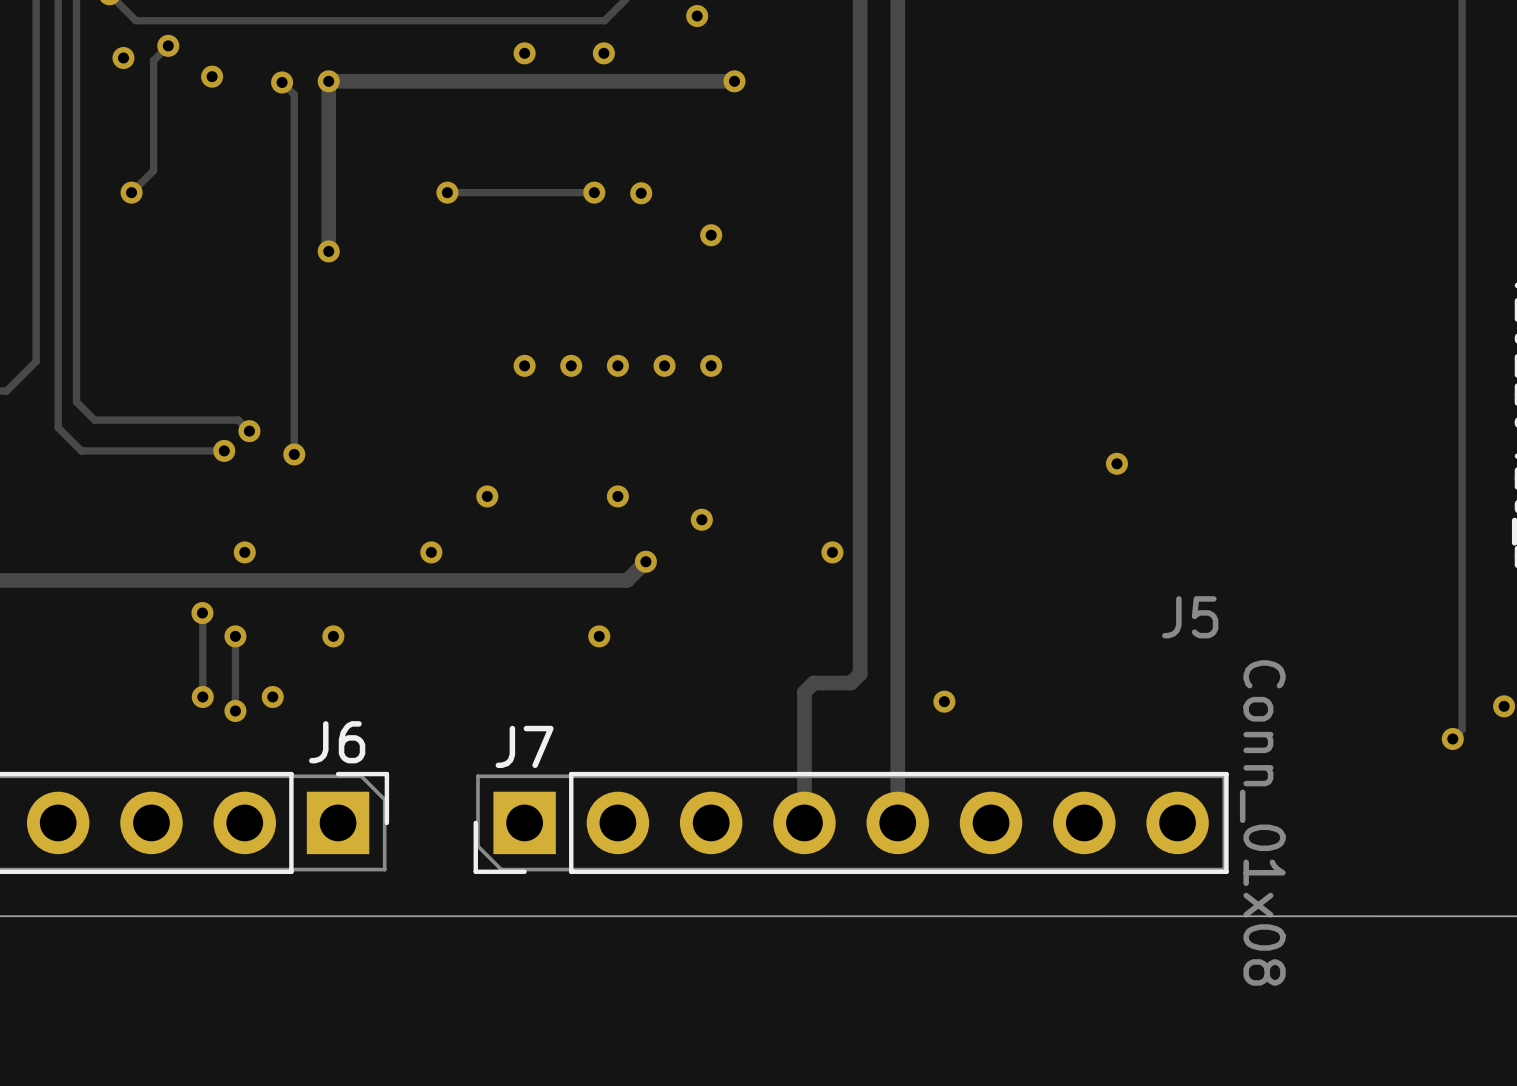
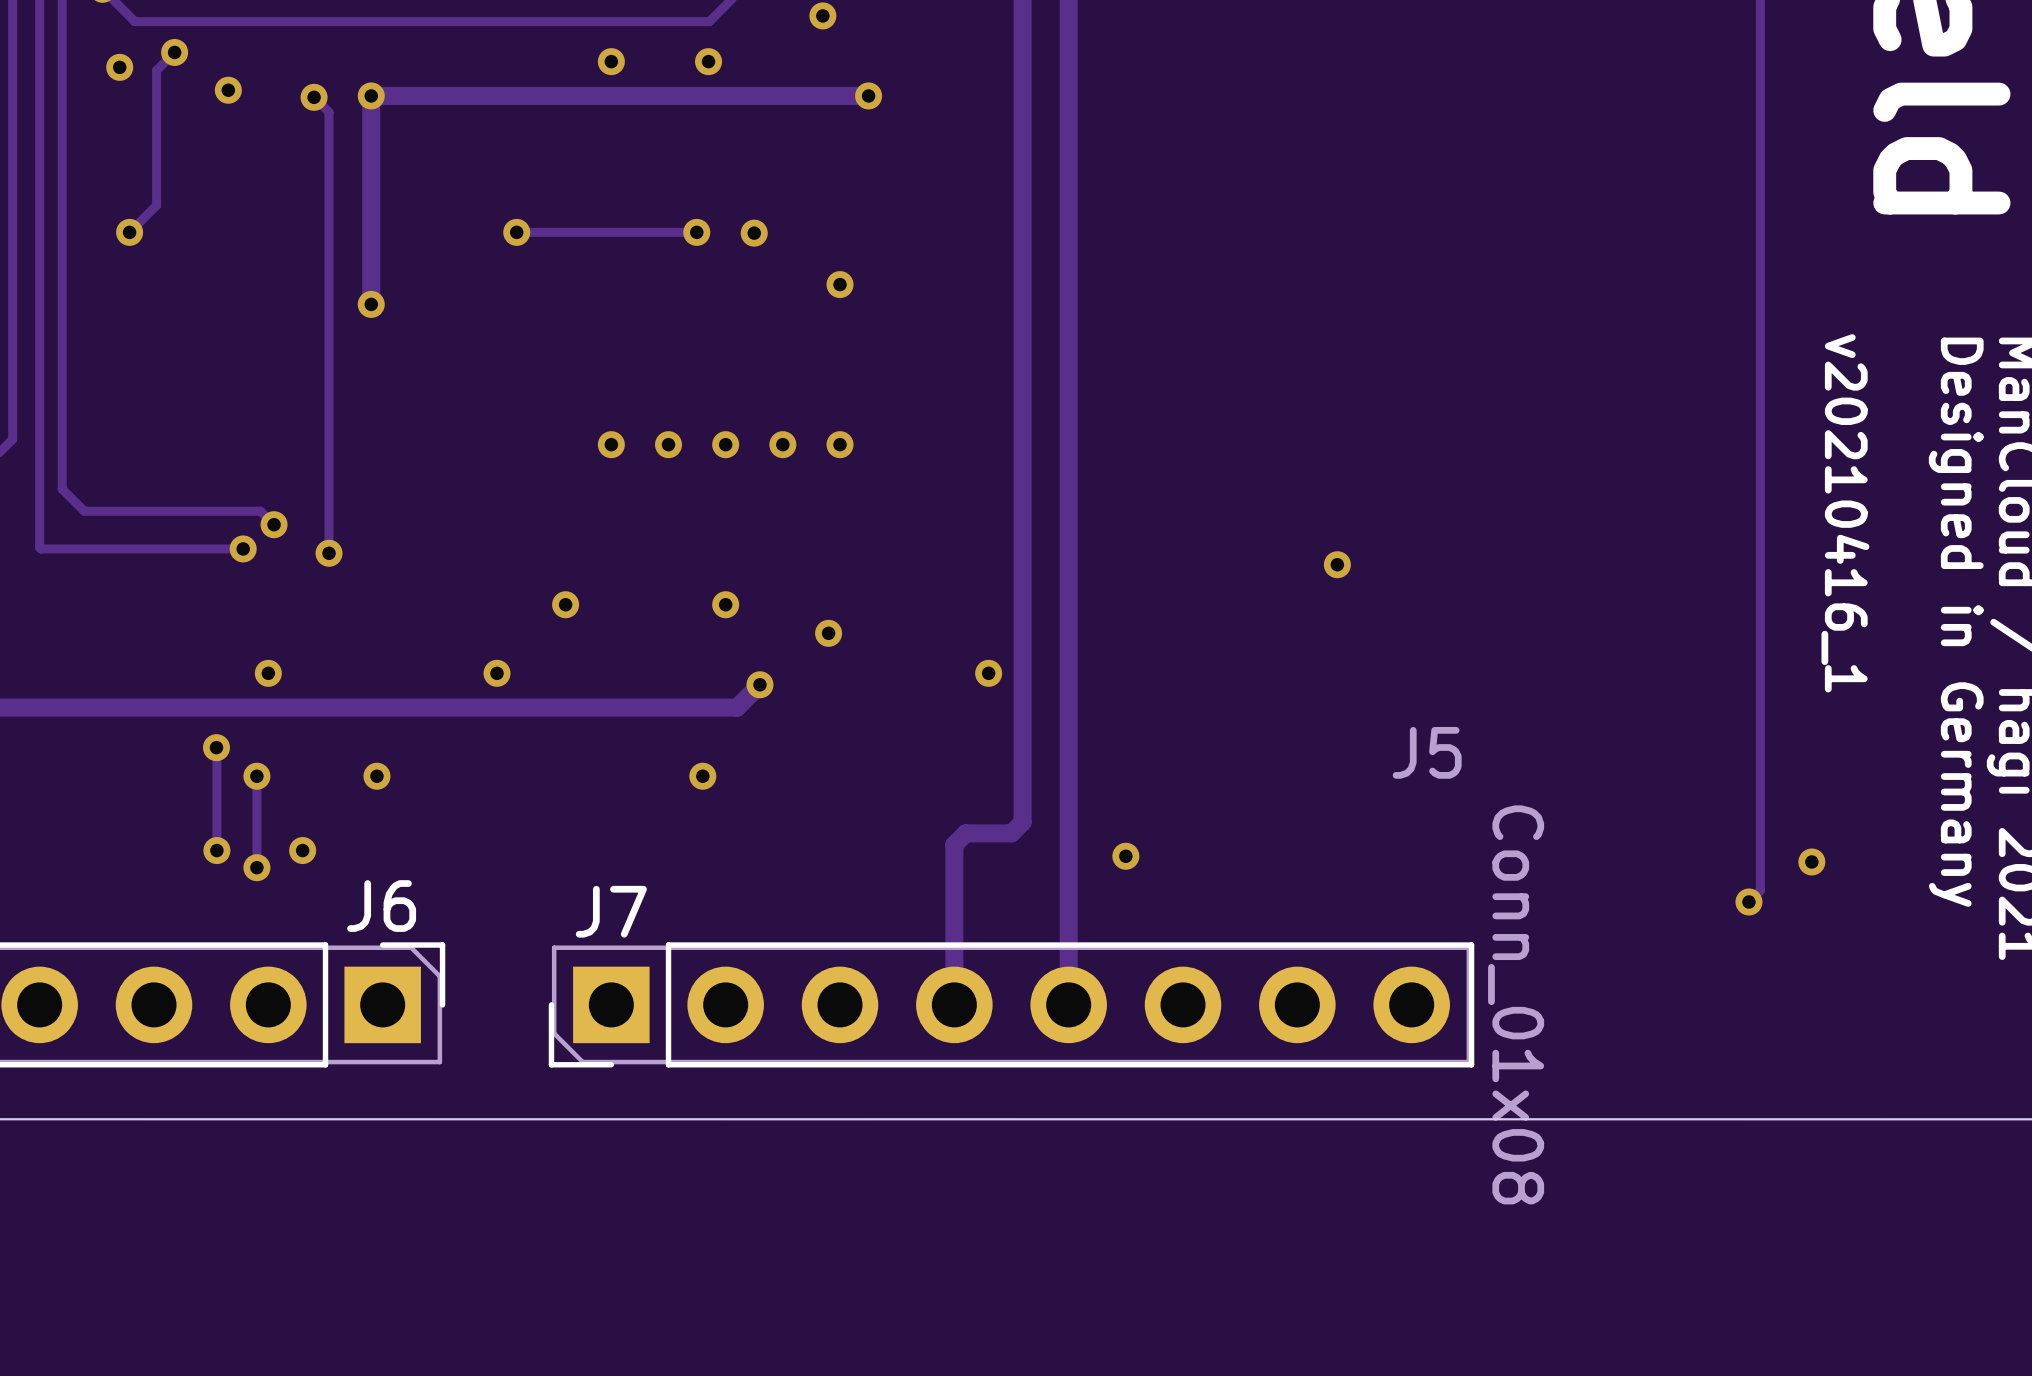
track: (58, 427) (81, 450) -> (39, 520) (39, 547) (68, 548)

